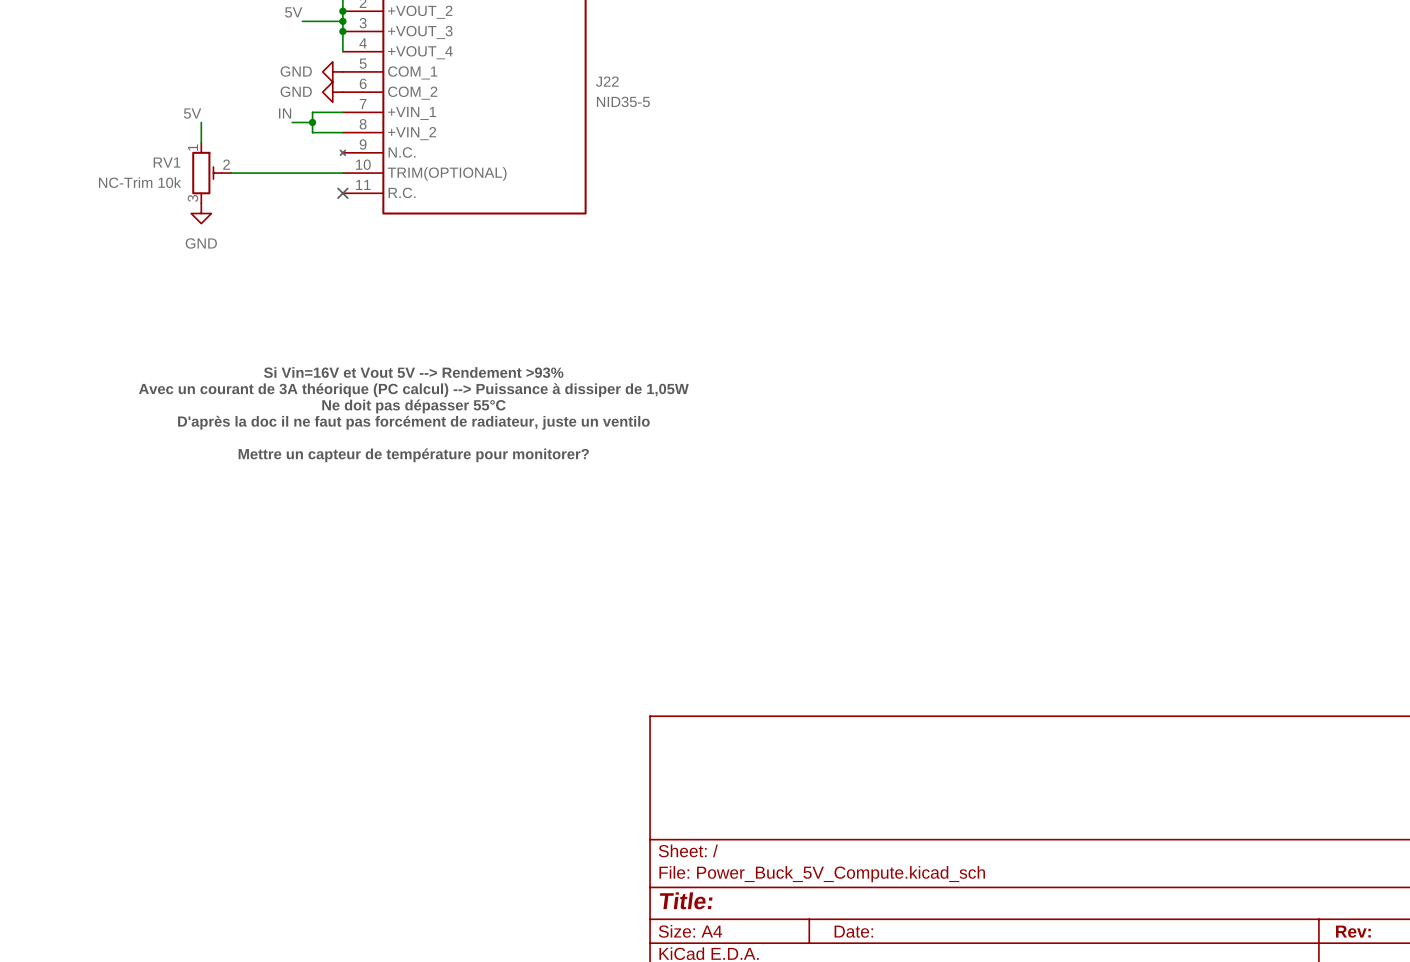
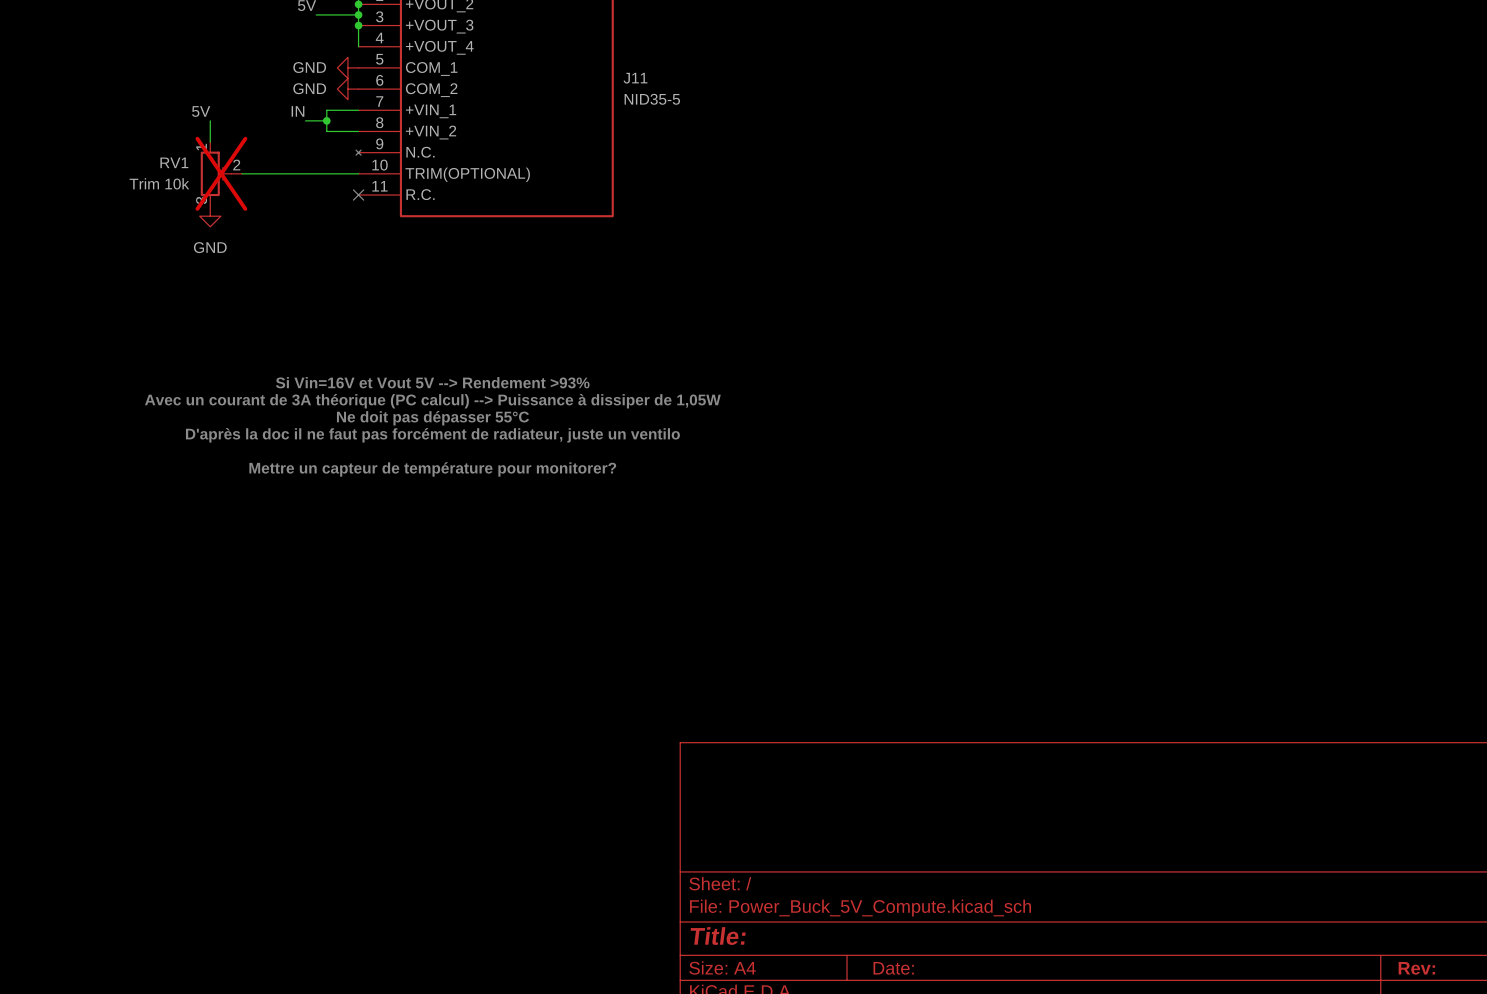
J22 name: J22 (607, 81) -> J11 (635, 78)
RV1 do-not-place cross: none -> (221, 173)
RV1 value: NC-Trim 10k (140, 182) -> Trim 10k (159, 183)

